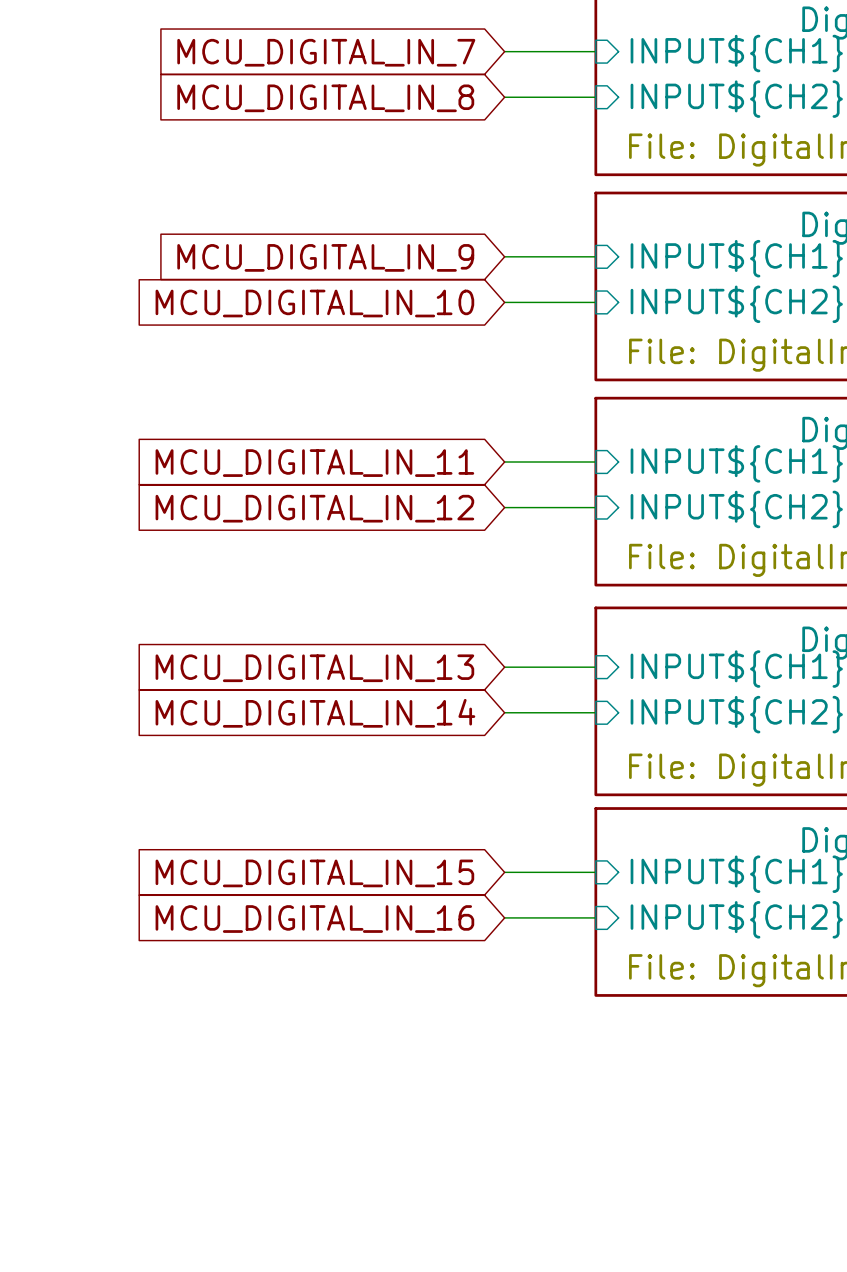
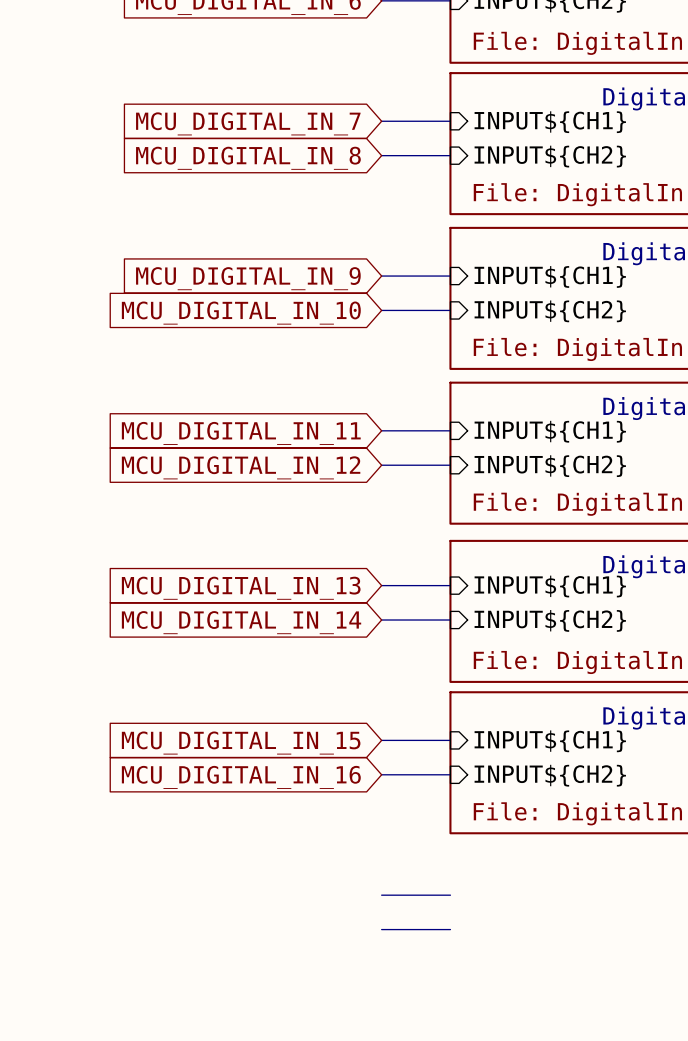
wire: none -> (381, 895) (450, 895)
wire: none -> (381, 929) (450, 929)

